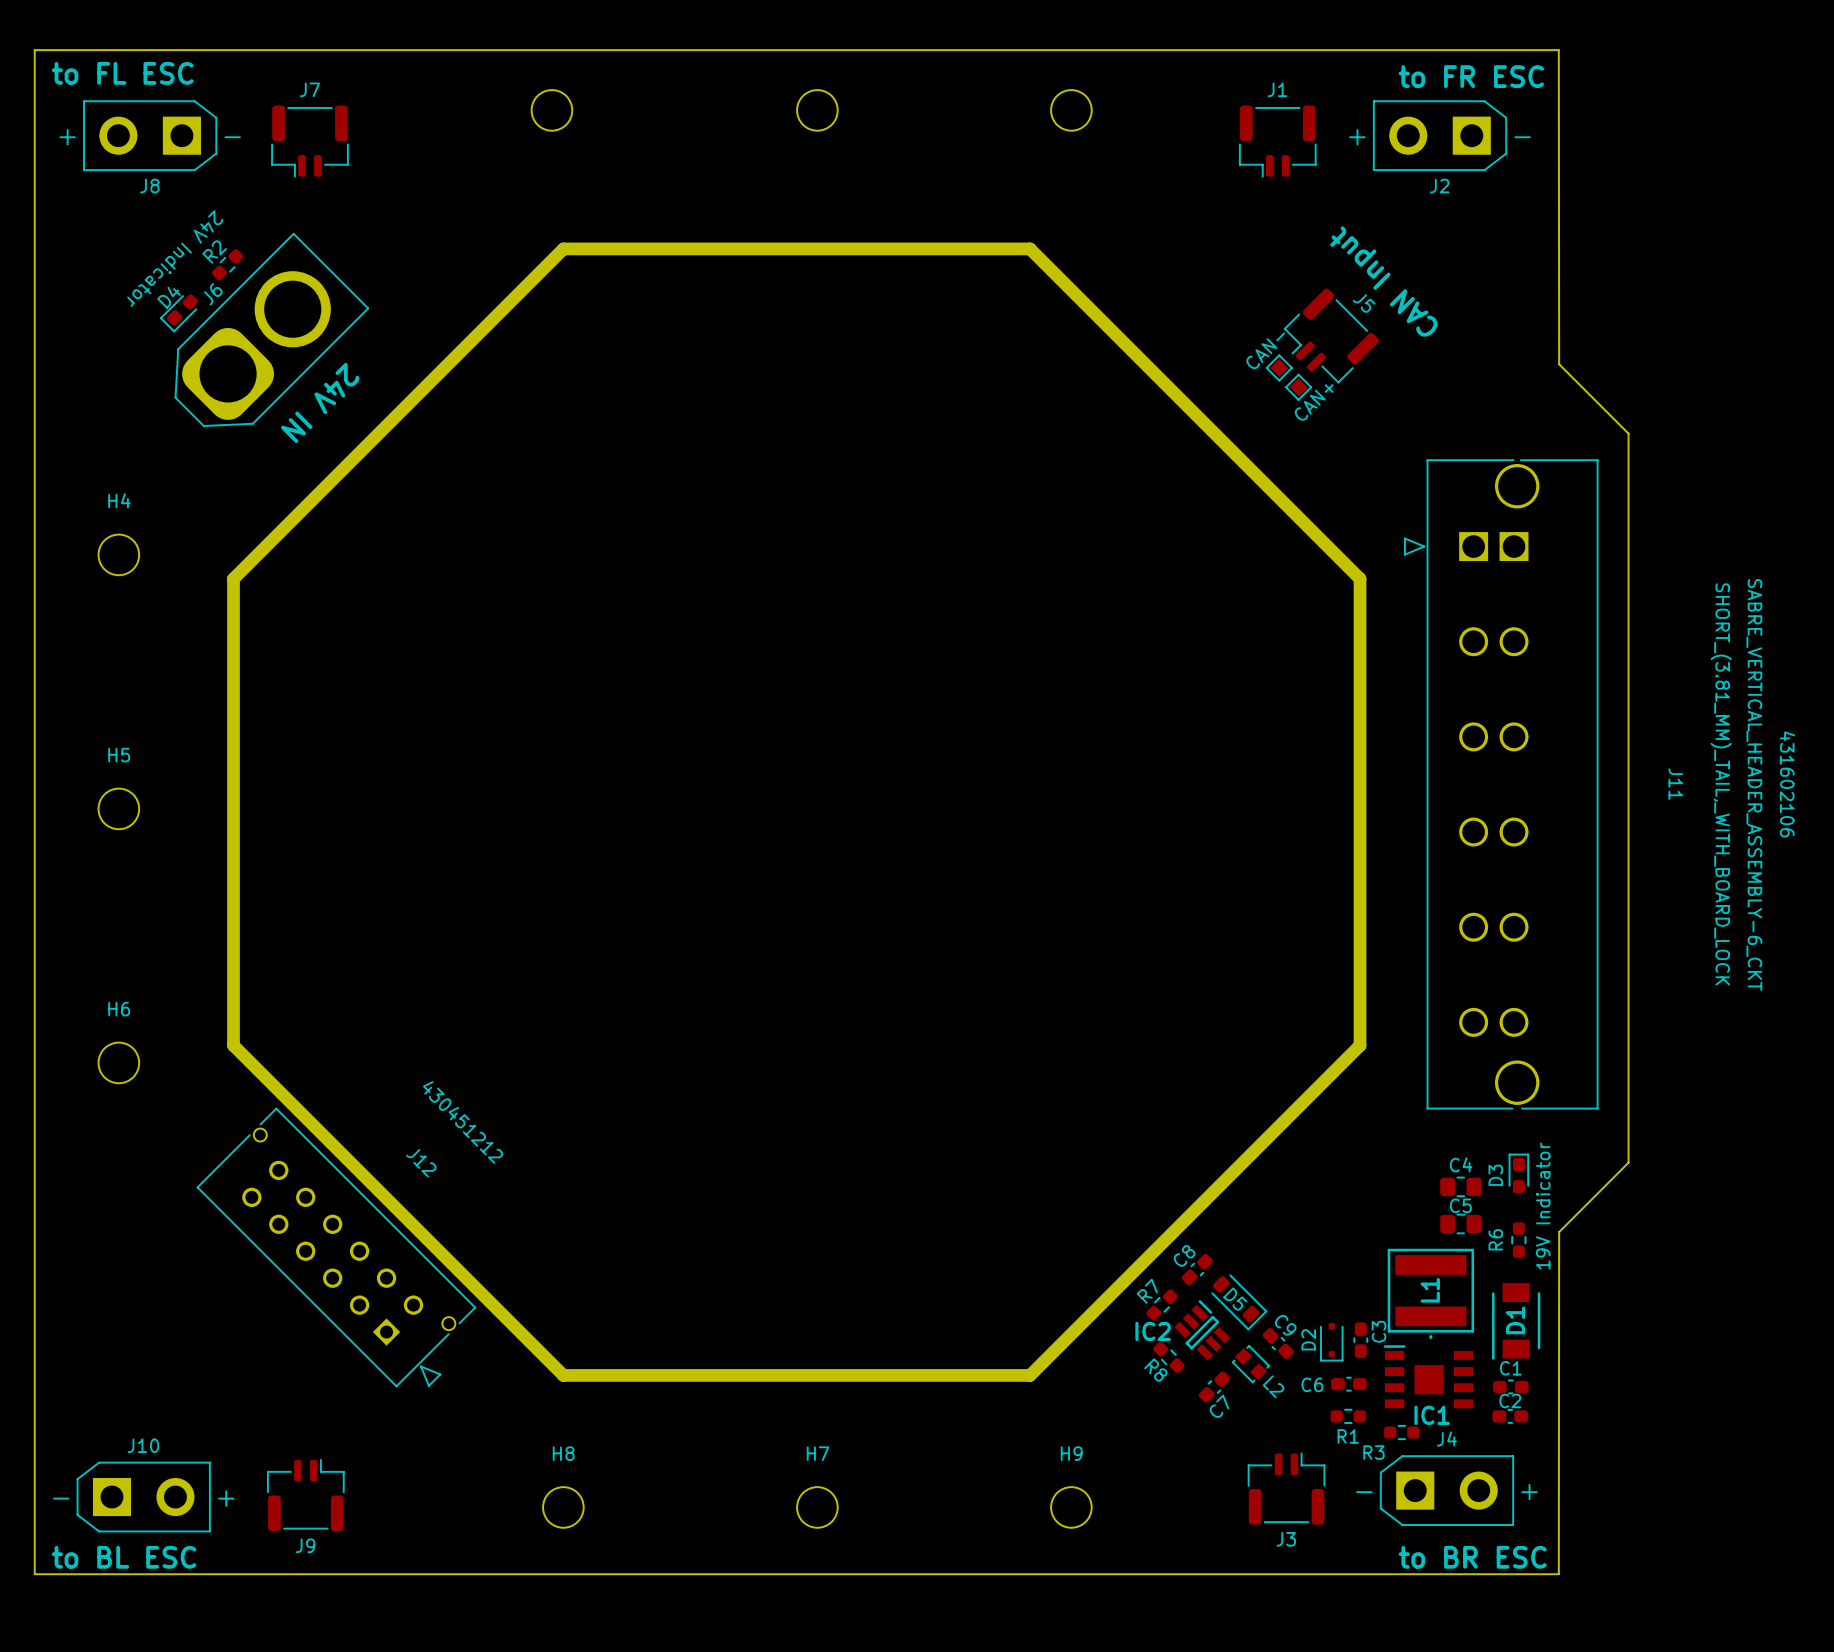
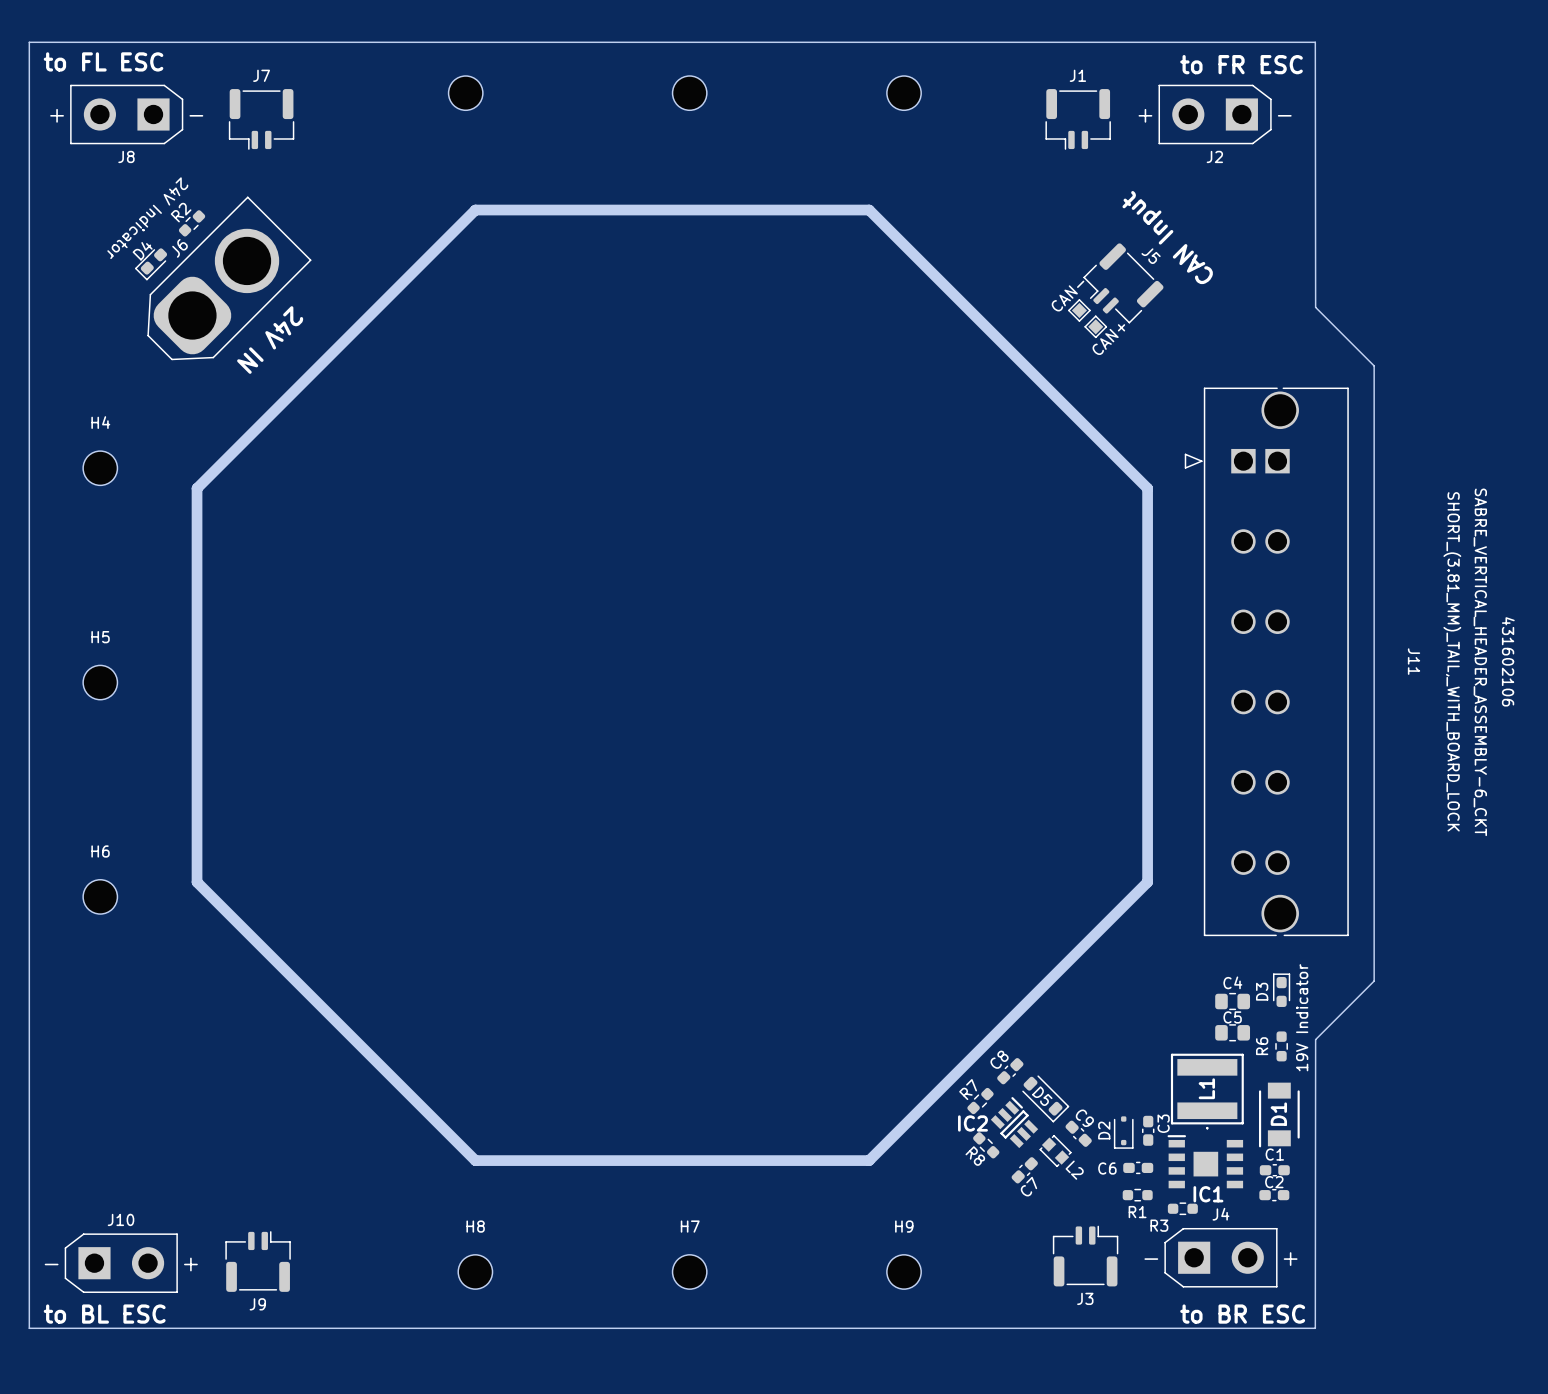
J12: (336, 1247) -> none

